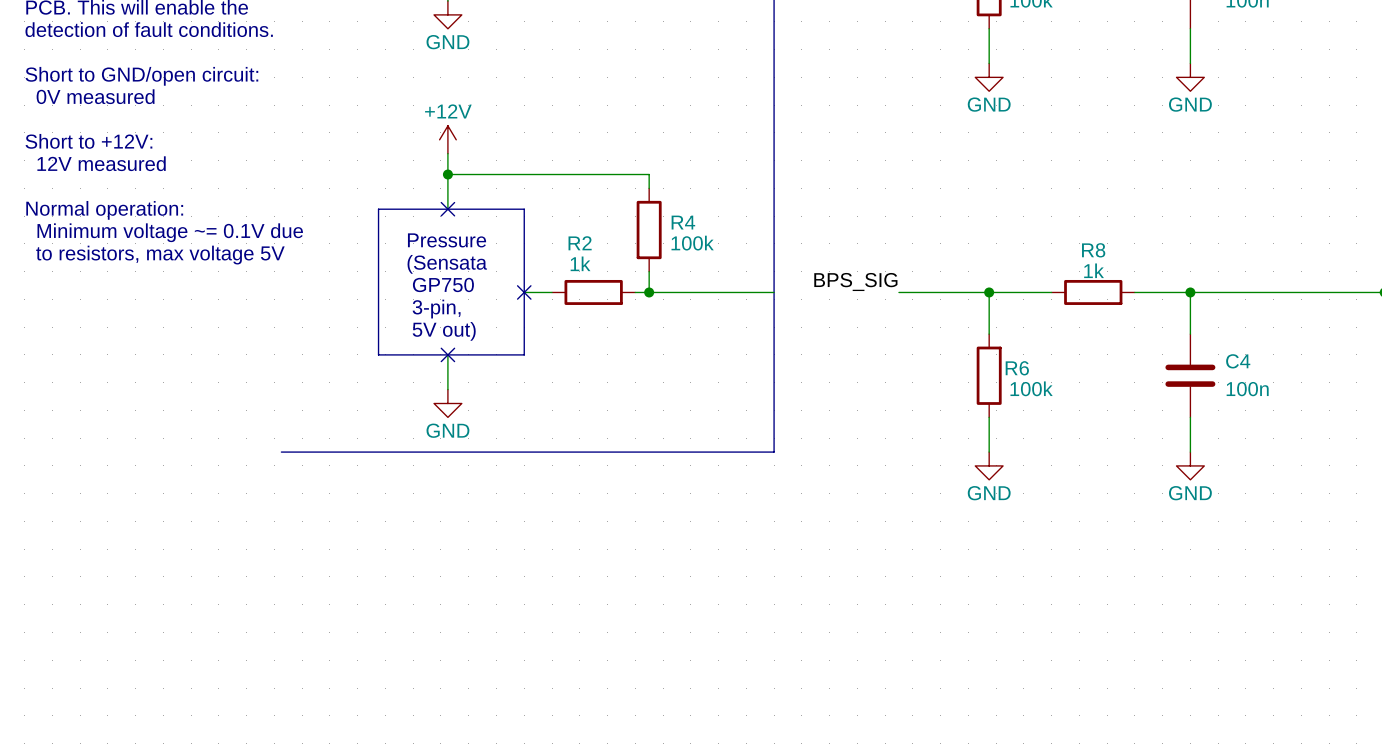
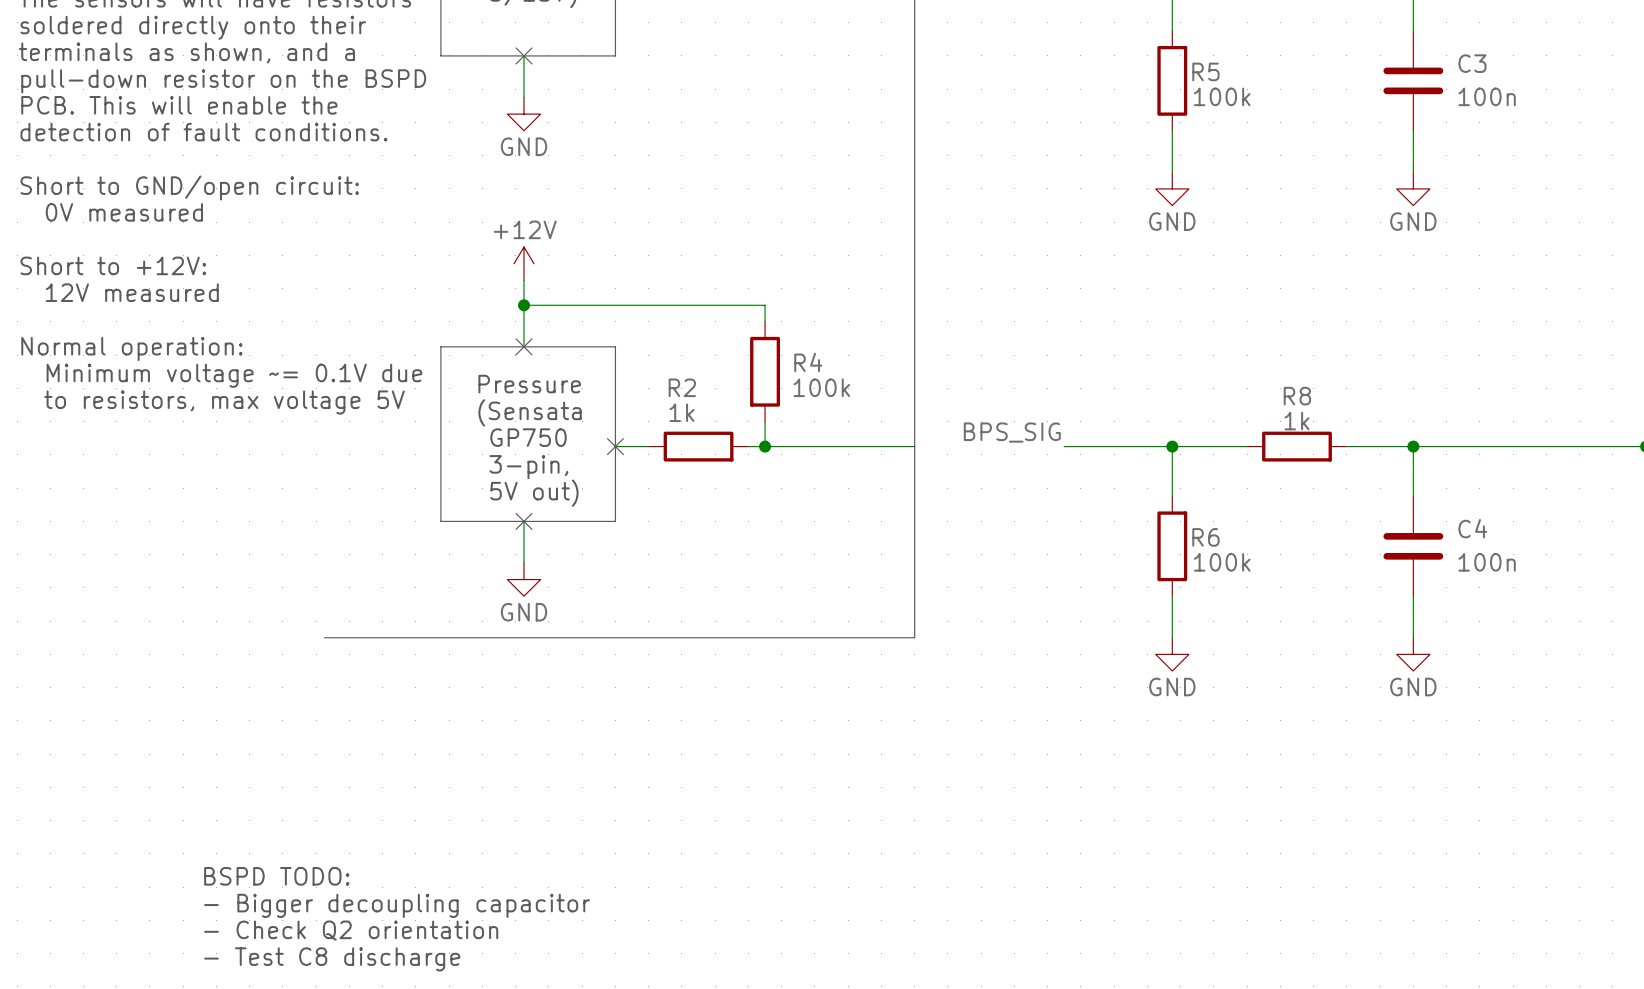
text: none -> BSPD TODO: (276, 876)
text: none -> - Bigger decoupling capacitor (397, 905)
text: none -> - Check Q2 orientation (351, 930)
text: none -> - Test C8 discharge (332, 959)

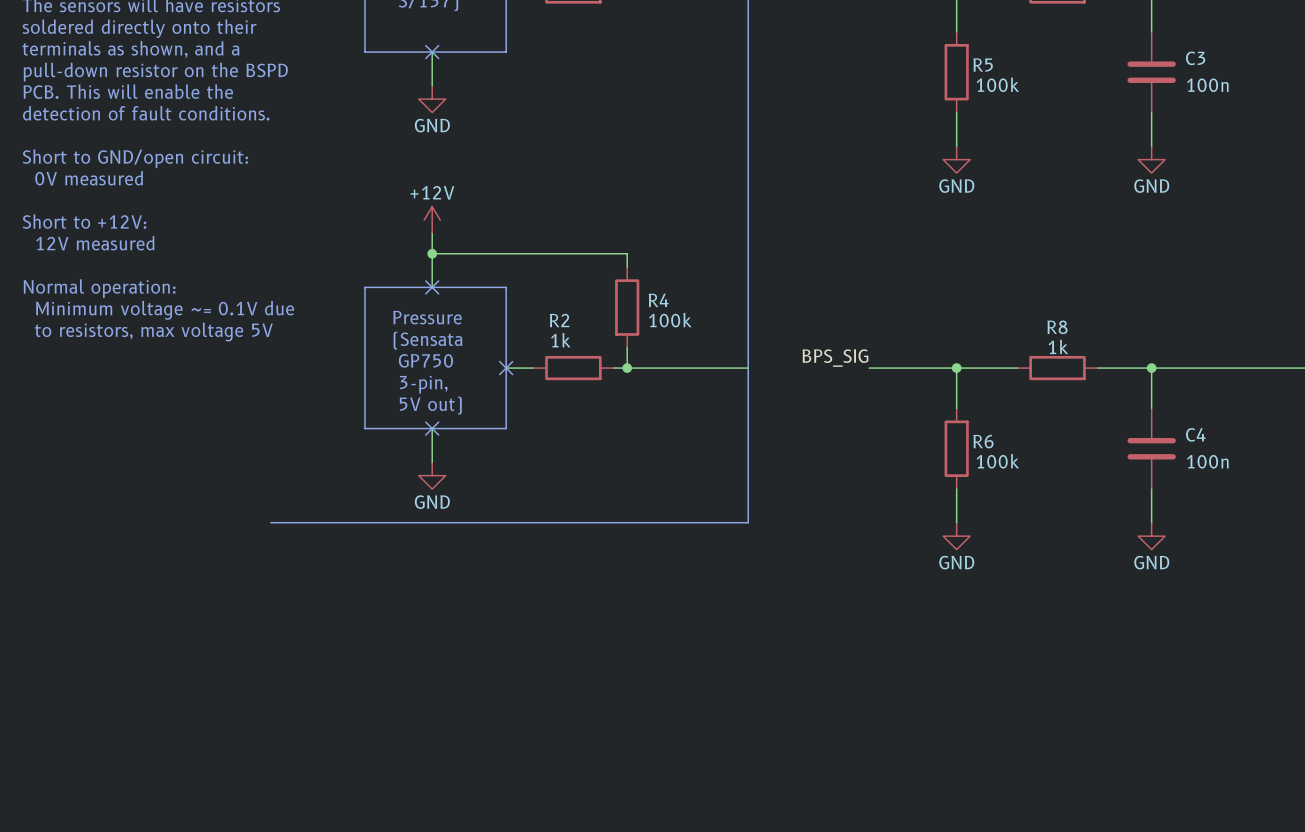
text: BSPD TODO: (276, 876) -> none
text: - Bigger decoupling capacitor (397, 905) -> none
text: - Check Q2 orientation (351, 930) -> none
text: - Test C8 discharge (332, 959) -> none

